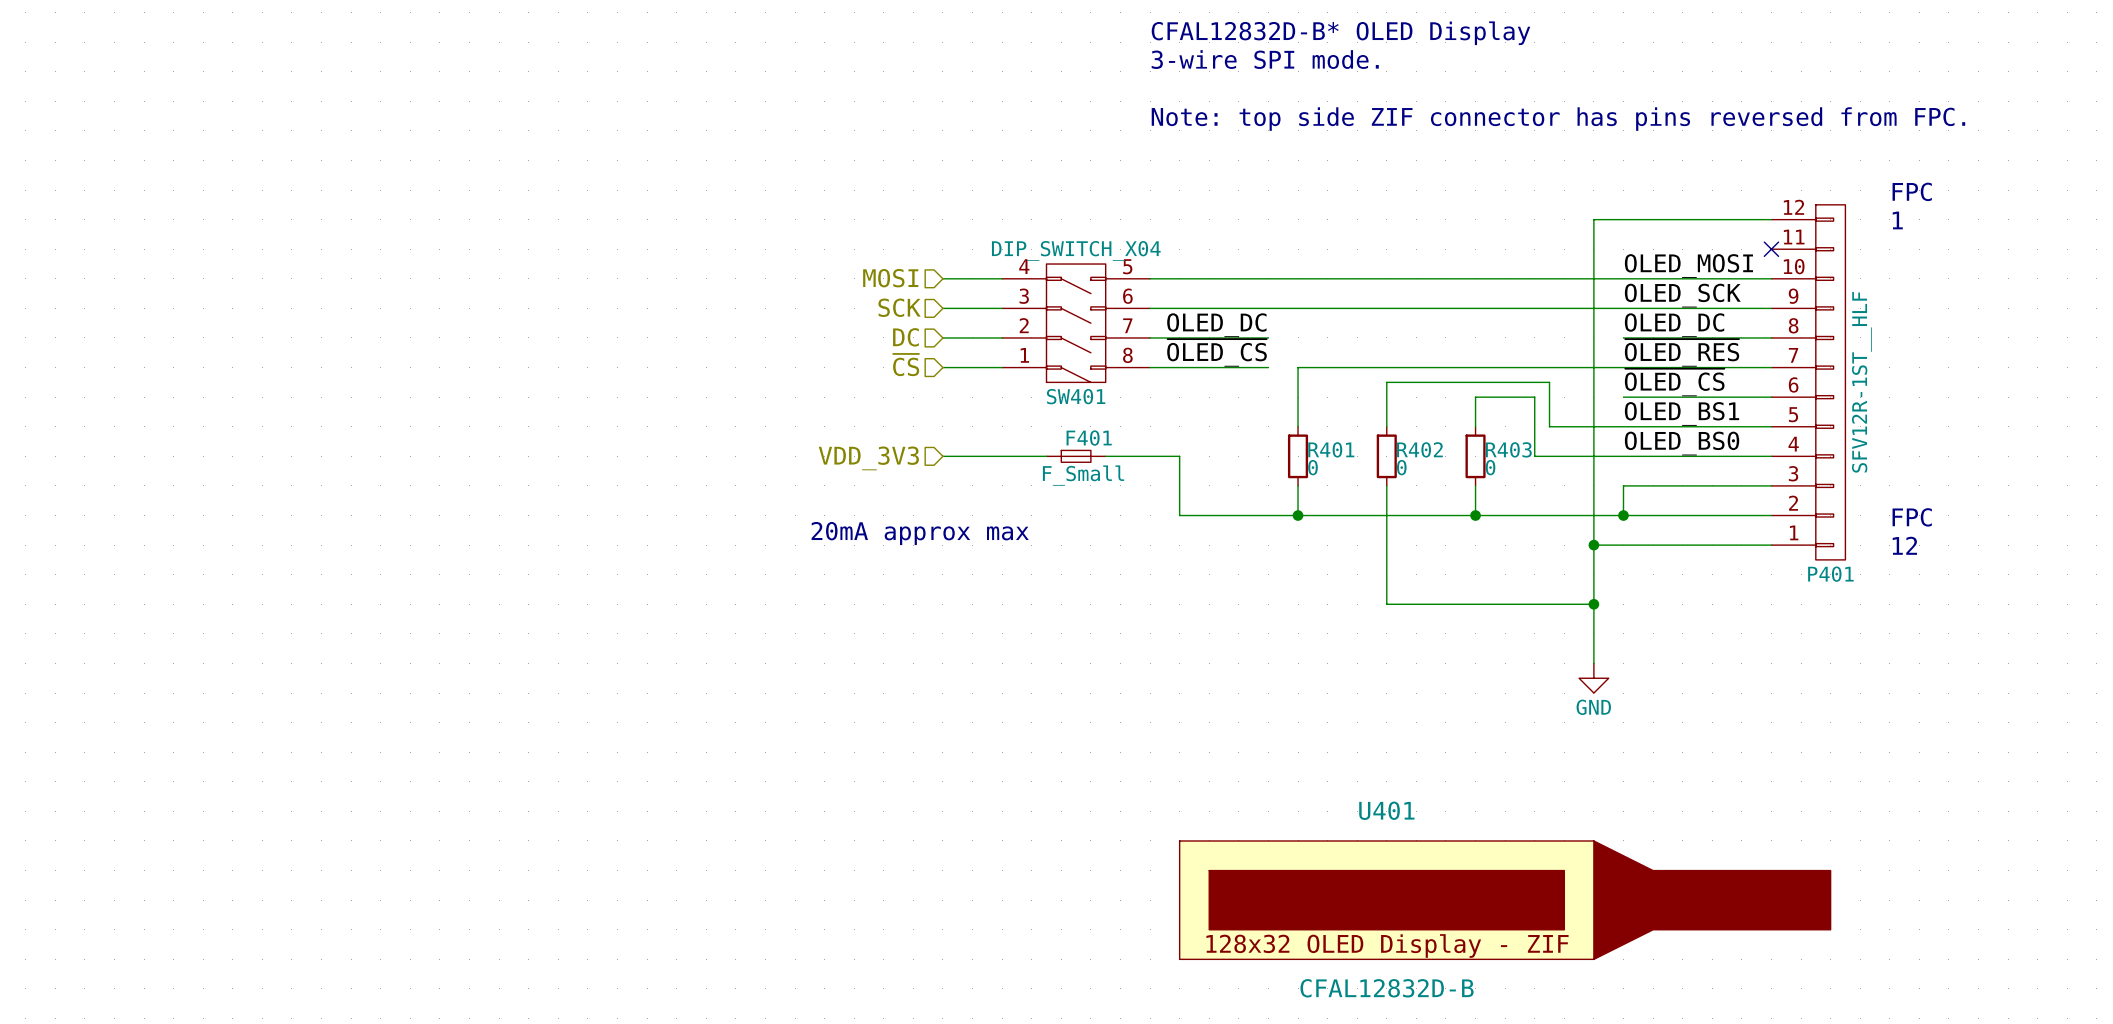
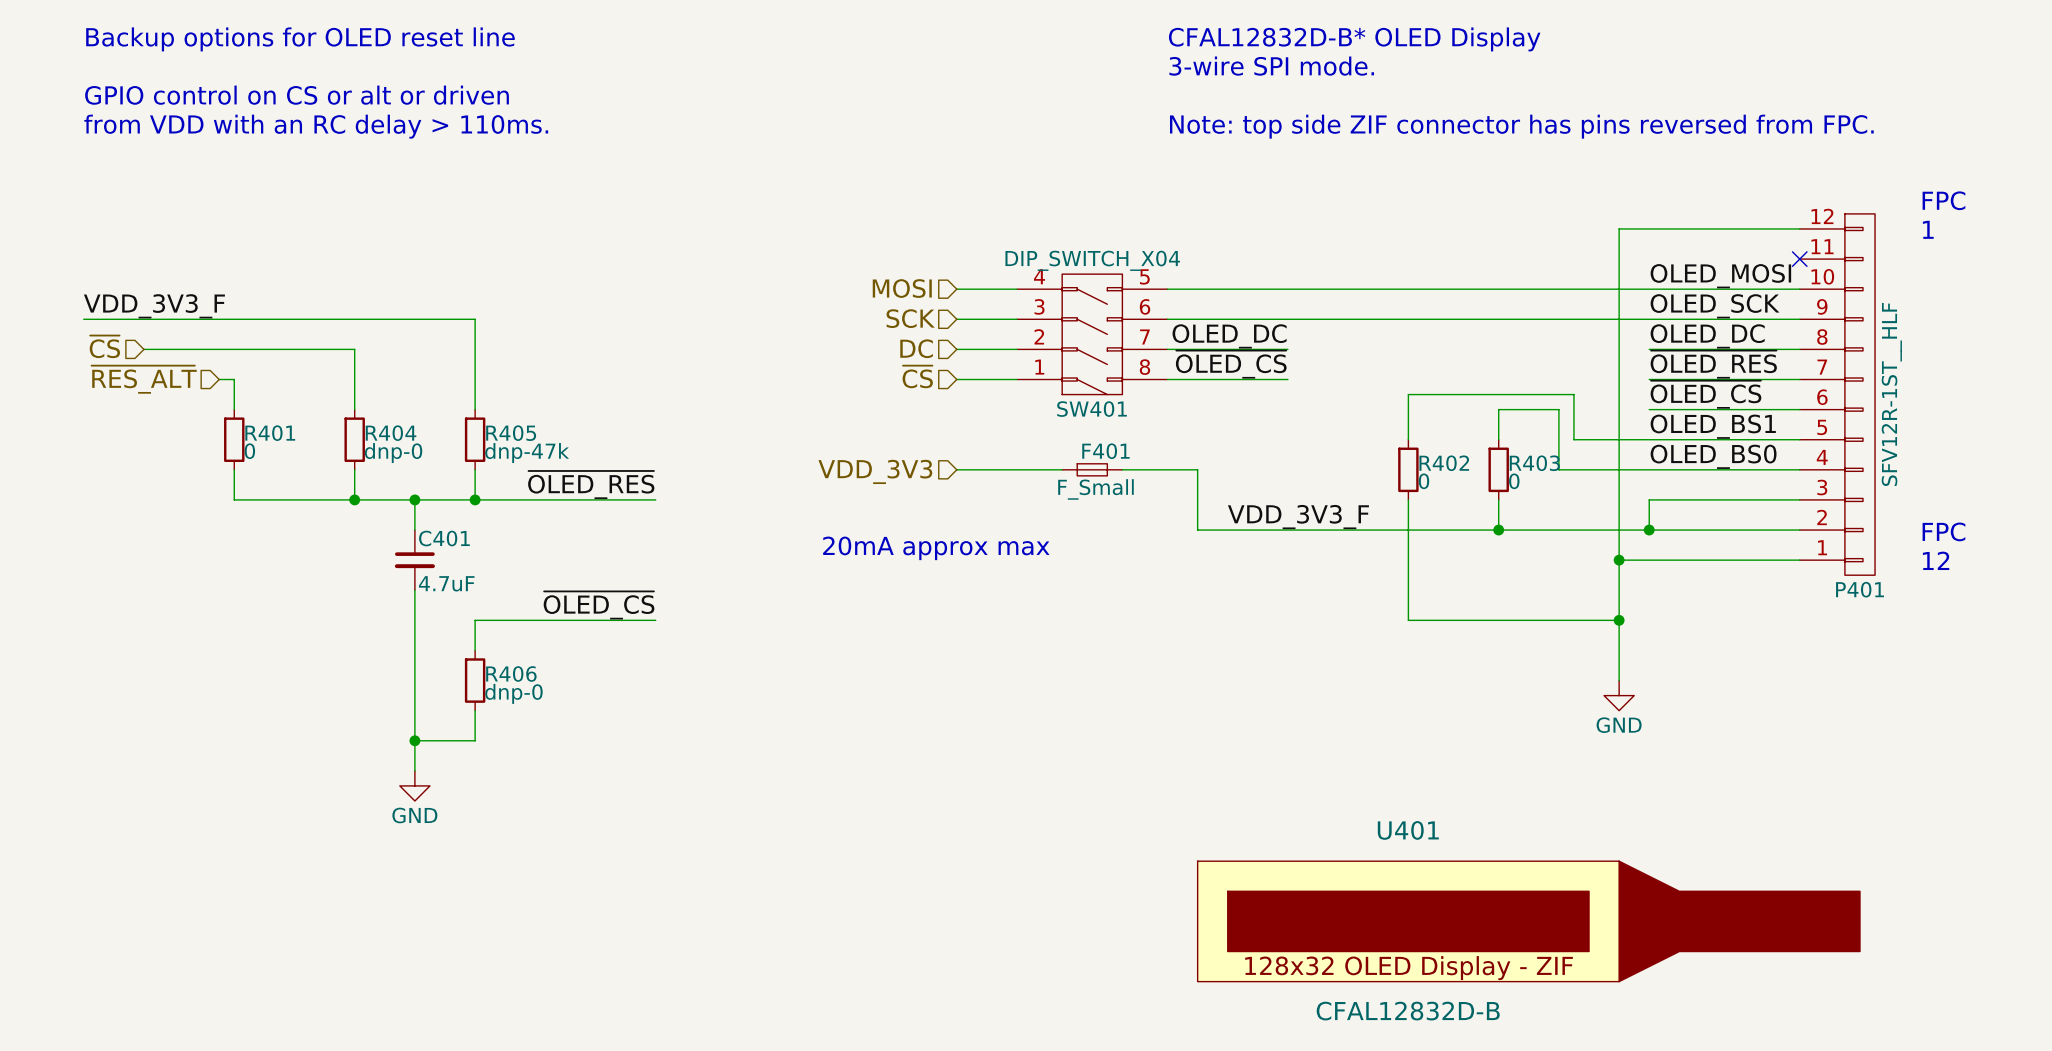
text: none -> Backup options for OLED reset line (300, 39)
text: none -> GPIO control on CS or alt or driven (297, 95)
text: none -> from VDD with an RC delay > 110ms. (316, 126)
label: none -> VDD_3V3_F (154, 306)
wire: none -> (83, 319) (475, 319) (475, 409)
hierarchical label: none -> ~{CS} (104, 346)
wire: none -> (143, 349) (354, 349) (354, 409)
hierarchical label: none -> ~{RES_ALT} (144, 379)
wire: none -> (219, 379) (234, 379) (234, 409)
wire: (1623, 367) (1298, 367) (1298, 426) -> none
R404: none -> dnp-0 (354, 439)
R405: none -> dnp-47k (475, 439)
wire: none -> (234, 469) (234, 499) (655, 499)
wire: none -> (354, 469) (354, 499)
wire: none -> (475, 469) (475, 499)
R401 position: (1298, 456) -> (234, 439)
label: none -> ~{OLED_RES} (591, 485)
junction: none -> (354, 499)
wire: none -> (414, 499) (414, 530)
junction: none -> (414, 499)
junction: none -> (475, 499)
wire: (1298, 485) (1298, 515) -> none
label: none -> VDD_3V3_F (1298, 517)
junction: (1298, 515) -> none
C401: none -> 4.7uF (414, 560)
wire: none -> (414, 590) (414, 770)
label: none -> ~{OLED_CS} (599, 605)
wire: none -> (655, 620) (475, 620) (475, 650)
R406: none -> dnp-0 (475, 680)
wire: none -> (475, 710) (475, 740) (414, 740)
junction: none -> (414, 740)
power symbol: none -> GND (414, 785)

